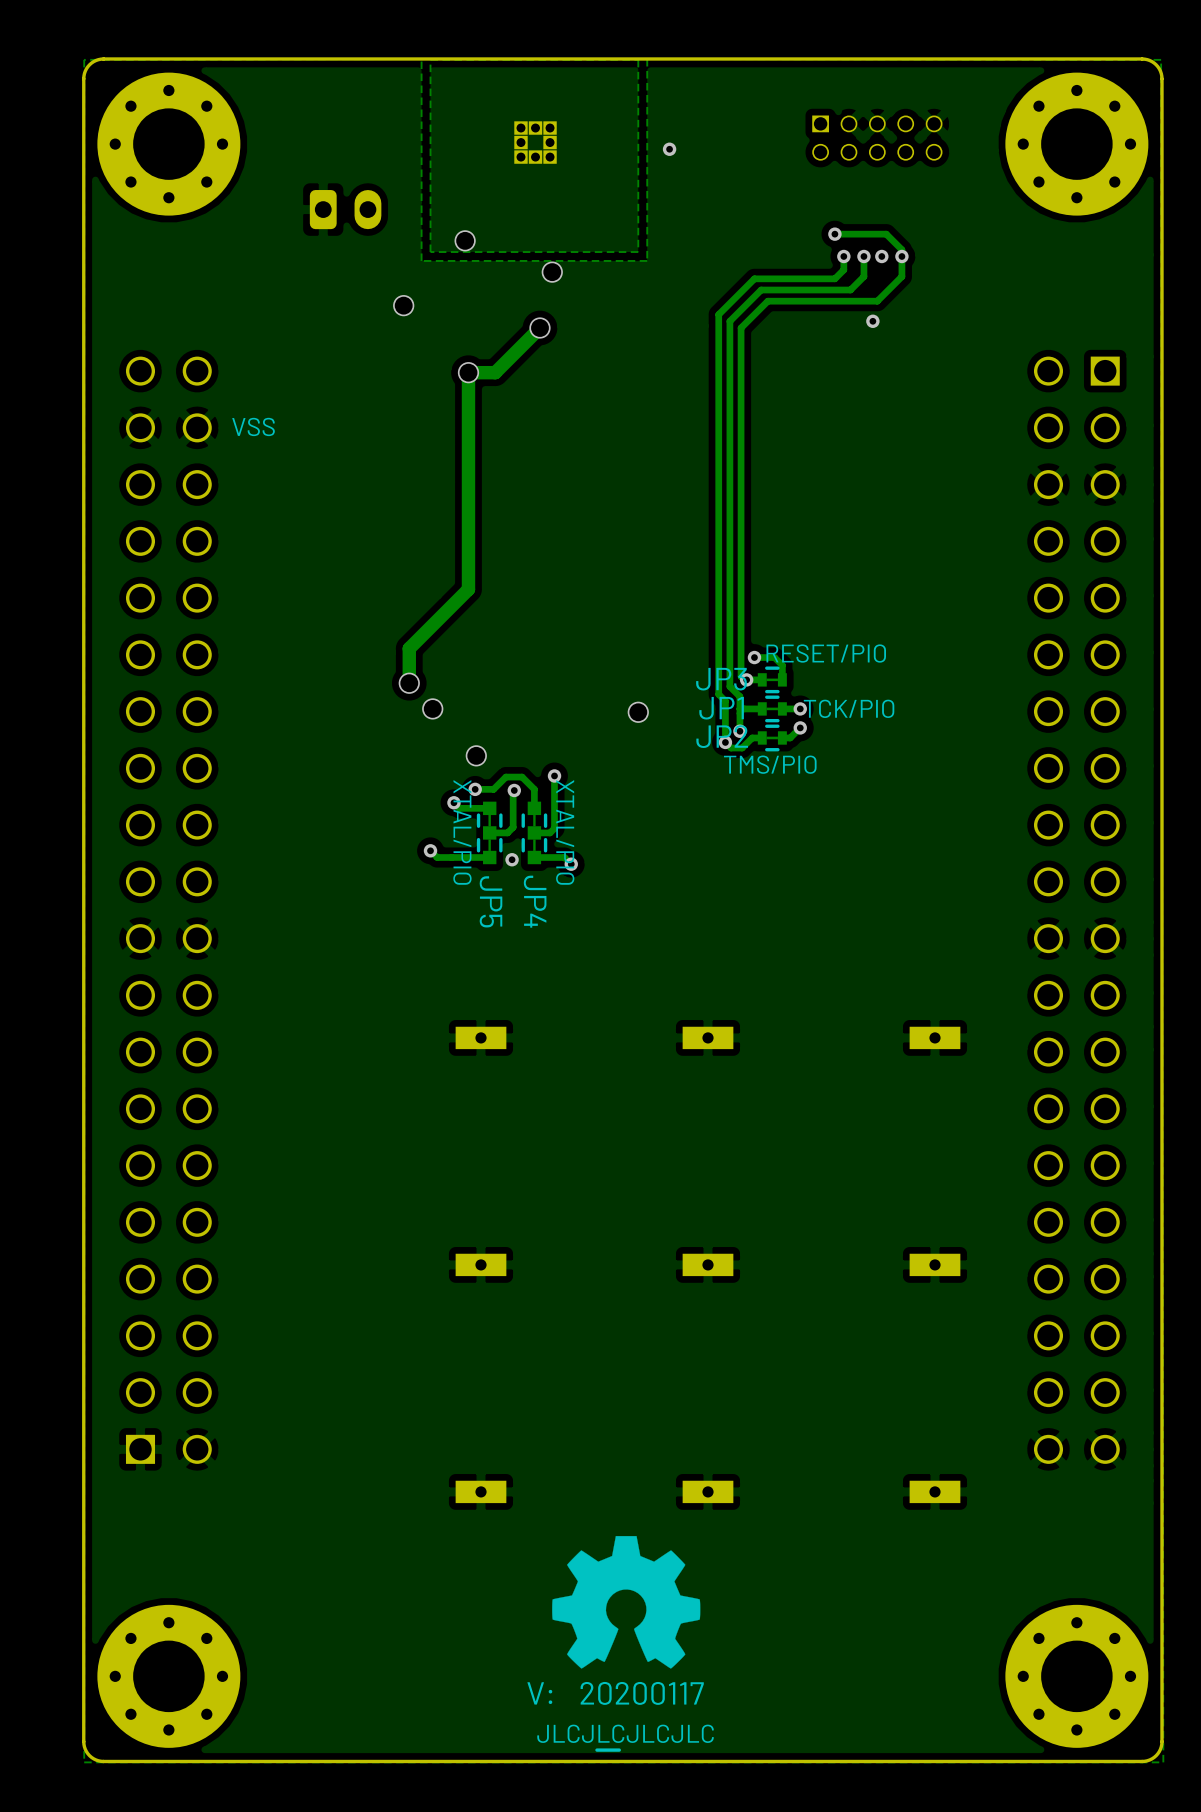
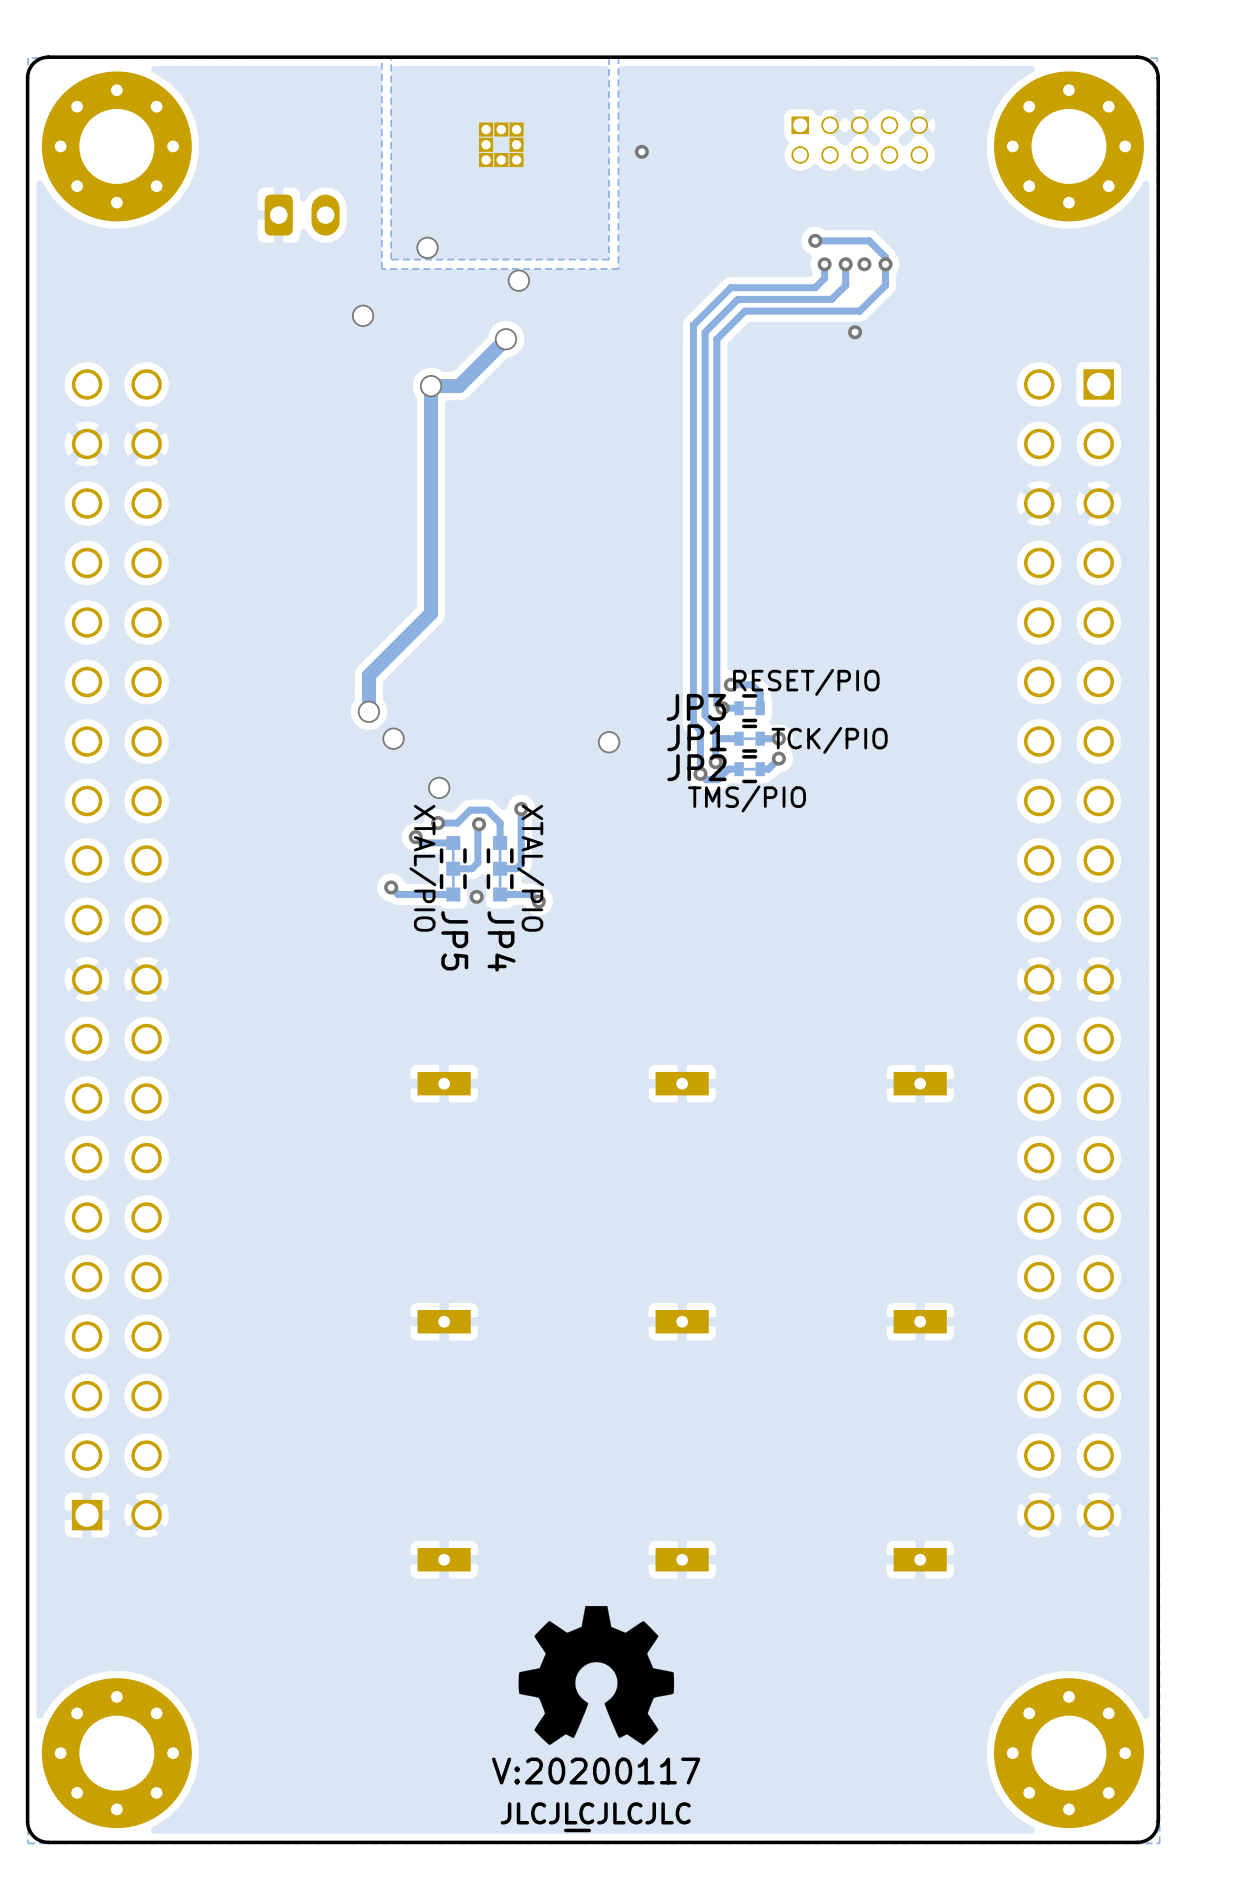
part text: VSS (253, 426) -> none

